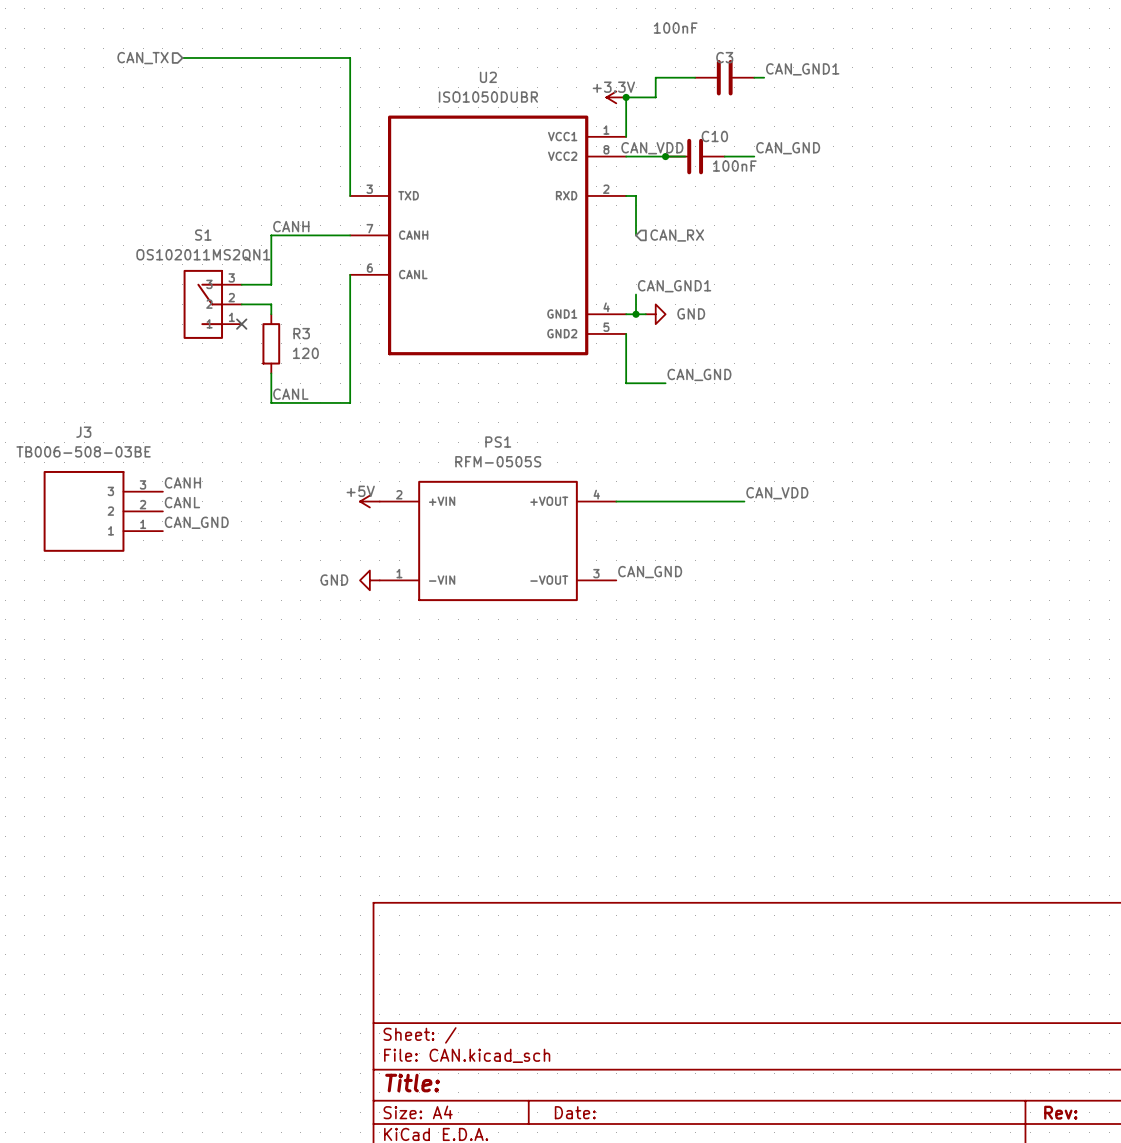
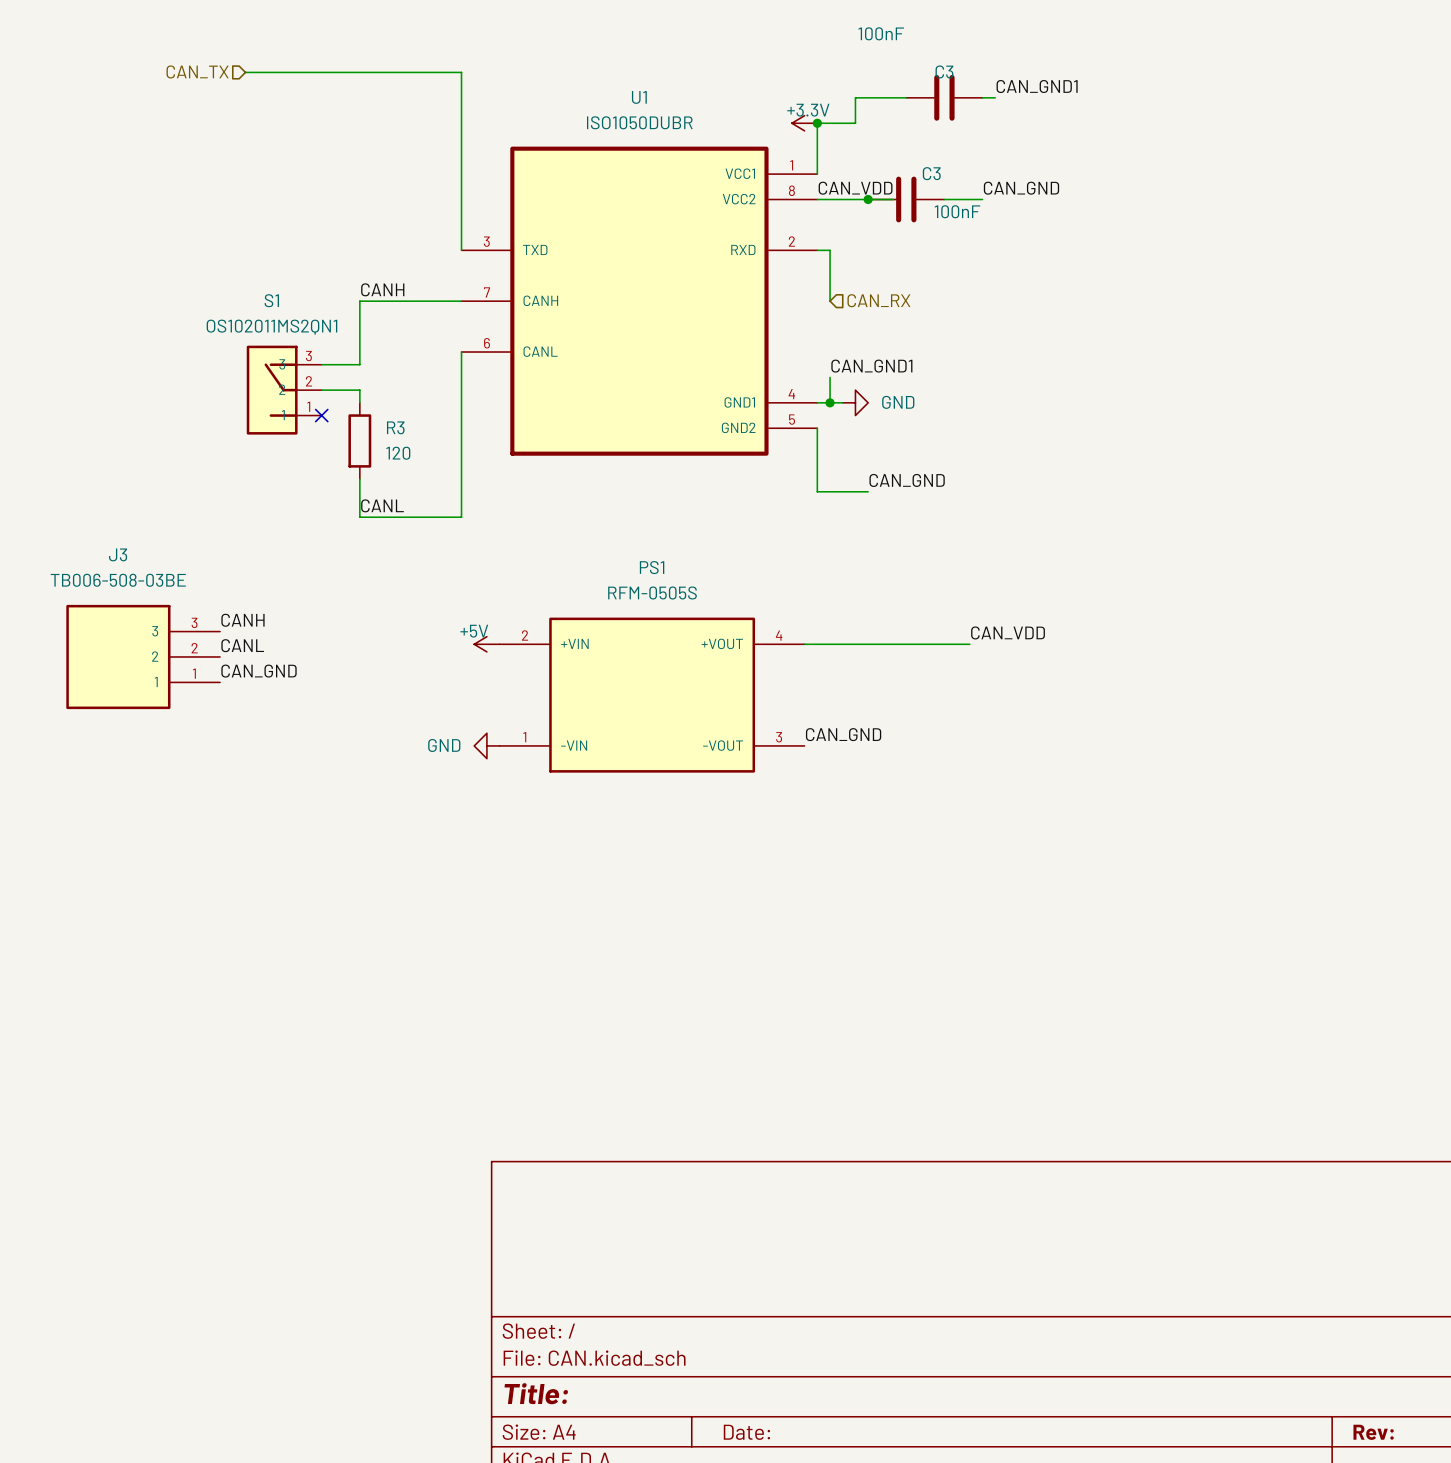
U2 name: U2 (488, 77) -> U1 (639, 97)
C10 name: C10 (714, 136) -> C3 (931, 173)

